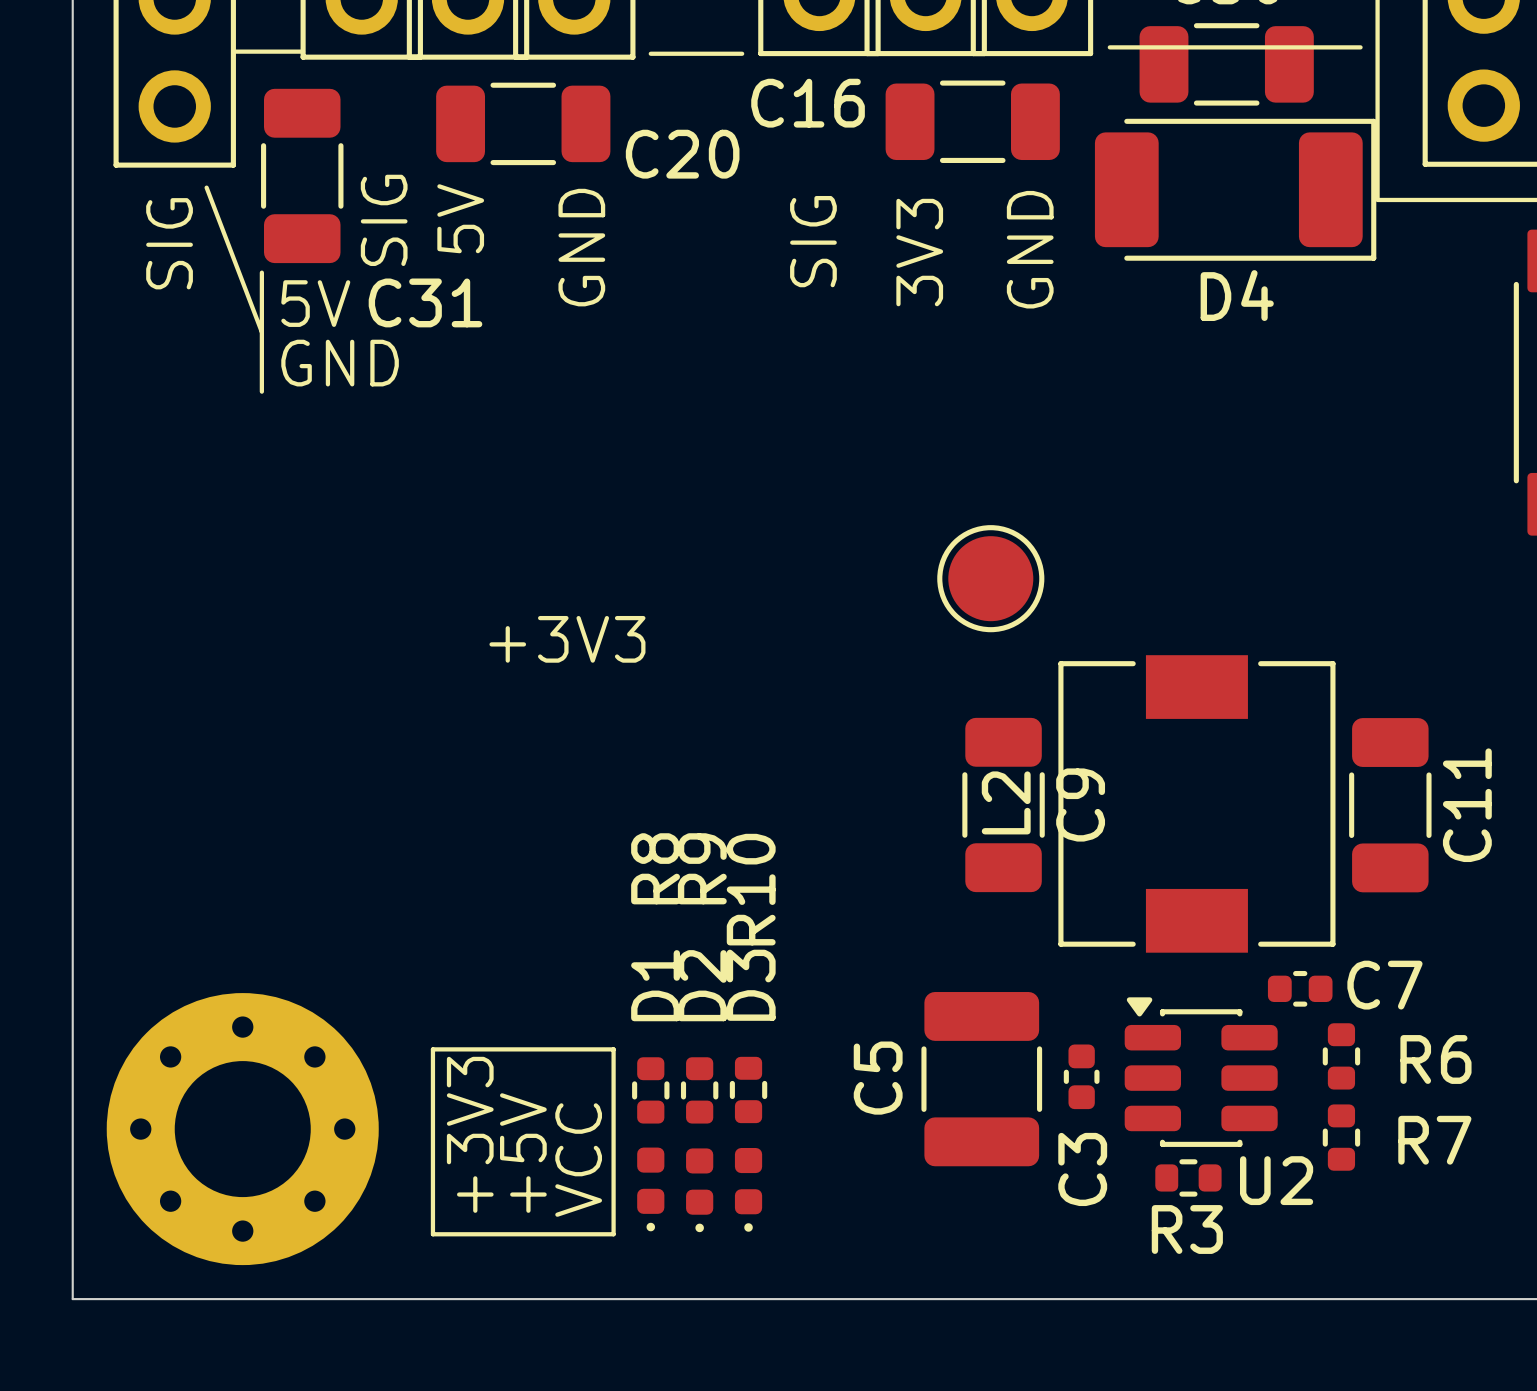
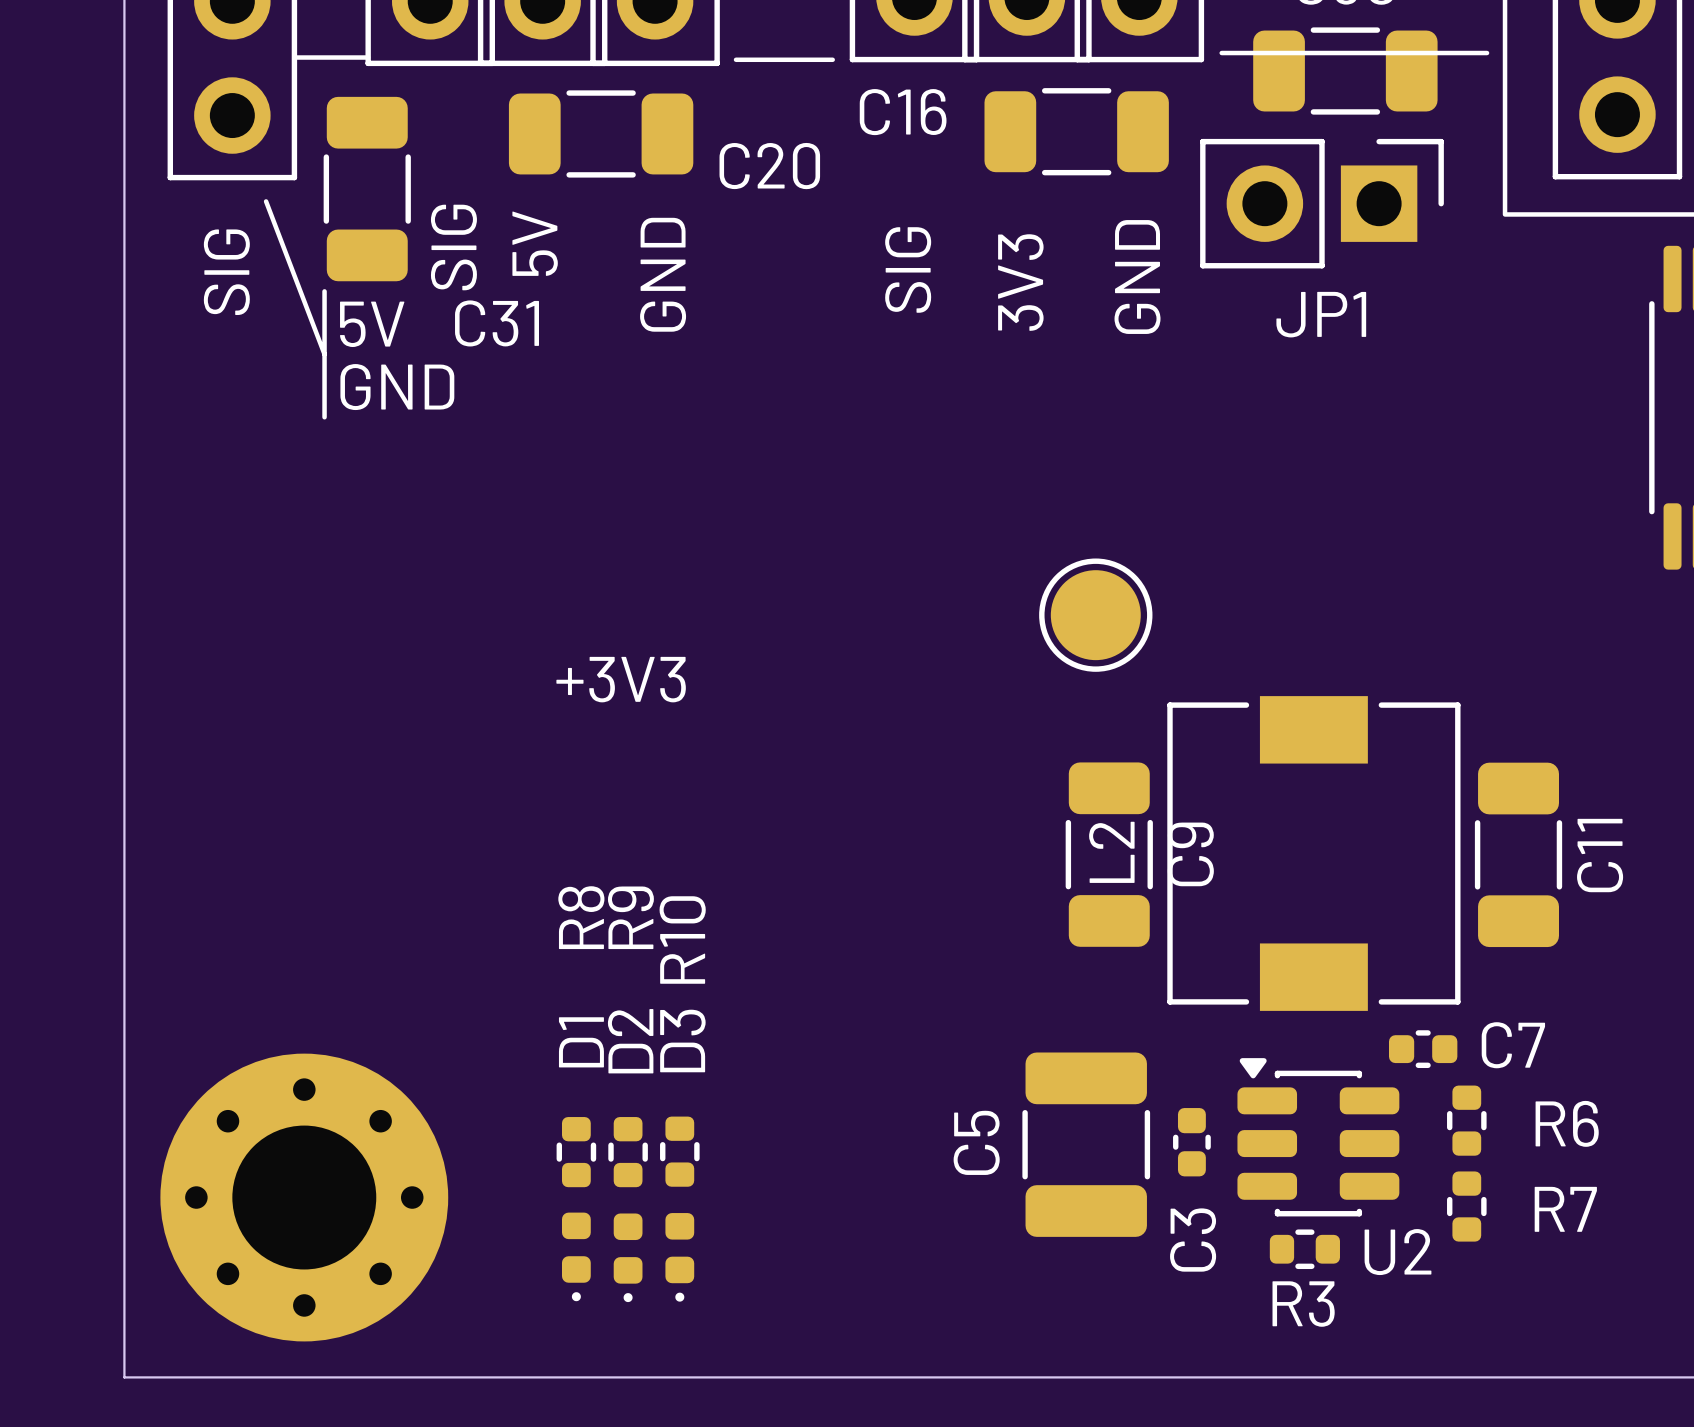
JP1: none -> (1321, 203)
D4: (1235, 189) -> none
line: (432, 1049) (613, 1049) (613, 1234) (432, 1234) (432, 1049) -> none
R10 position: (748, 1089) -> (679, 1151)
R8 position: (650, 1090) -> (576, 1152)
R9 position: (699, 1090) -> (628, 1152)
text: +3V3 (470, 1134) -> none
text: +5V (523, 1153) -> none
text: VCC (578, 1160) -> none
D1 position: (650, 1189) -> (576, 1256)
D3 position: (748, 1189) -> (679, 1257)
D2 position: (699, 1190) -> (628, 1257)

